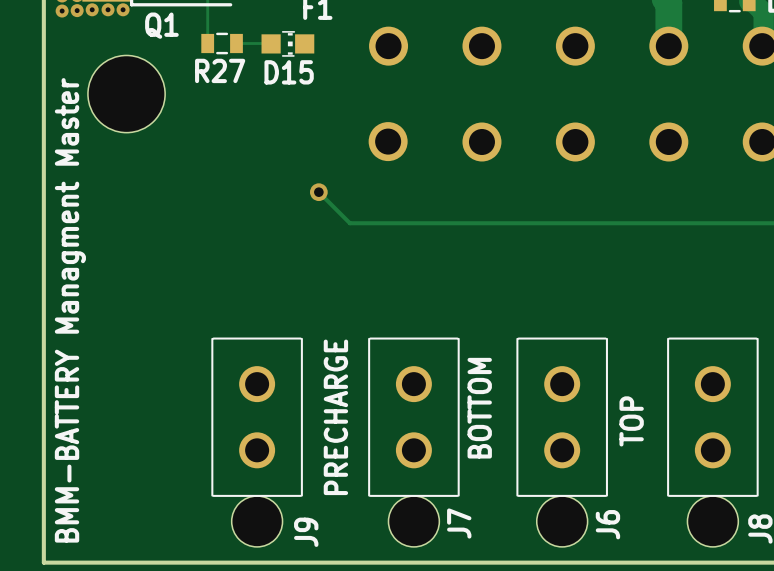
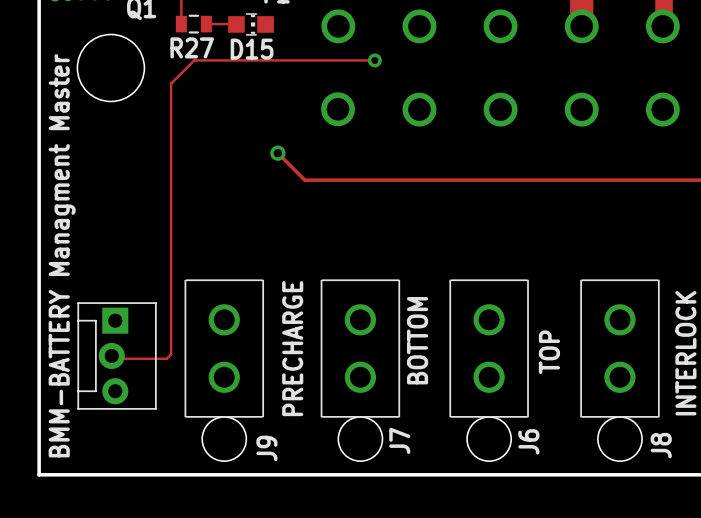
track: none -> (374, 60) (194, 60) (171, 83) (171, 354) (166, 358) (114, 358) (111, 355)
via: none -> (374, 60)
part: none -> (117, 355)

